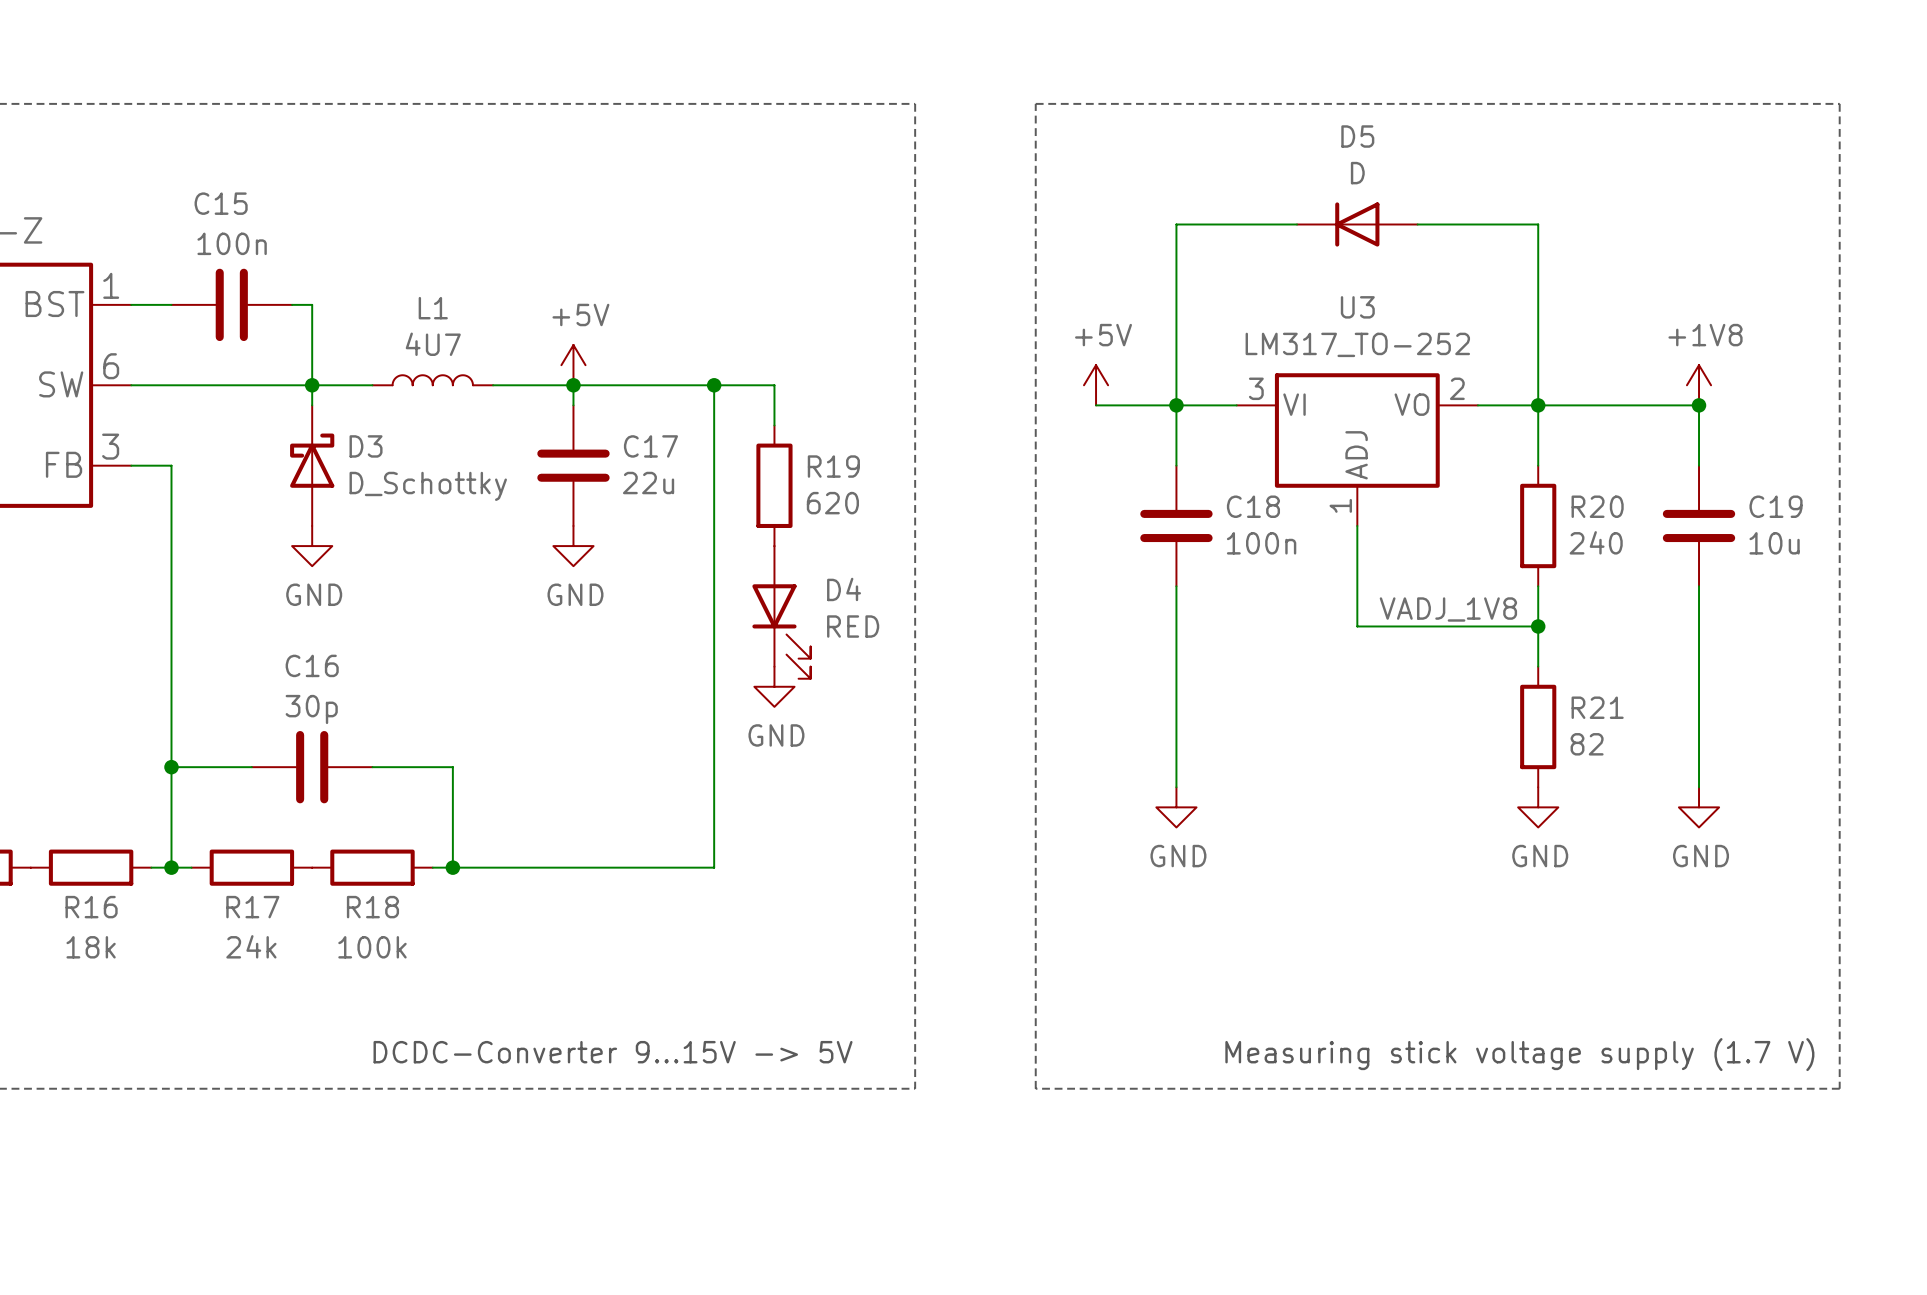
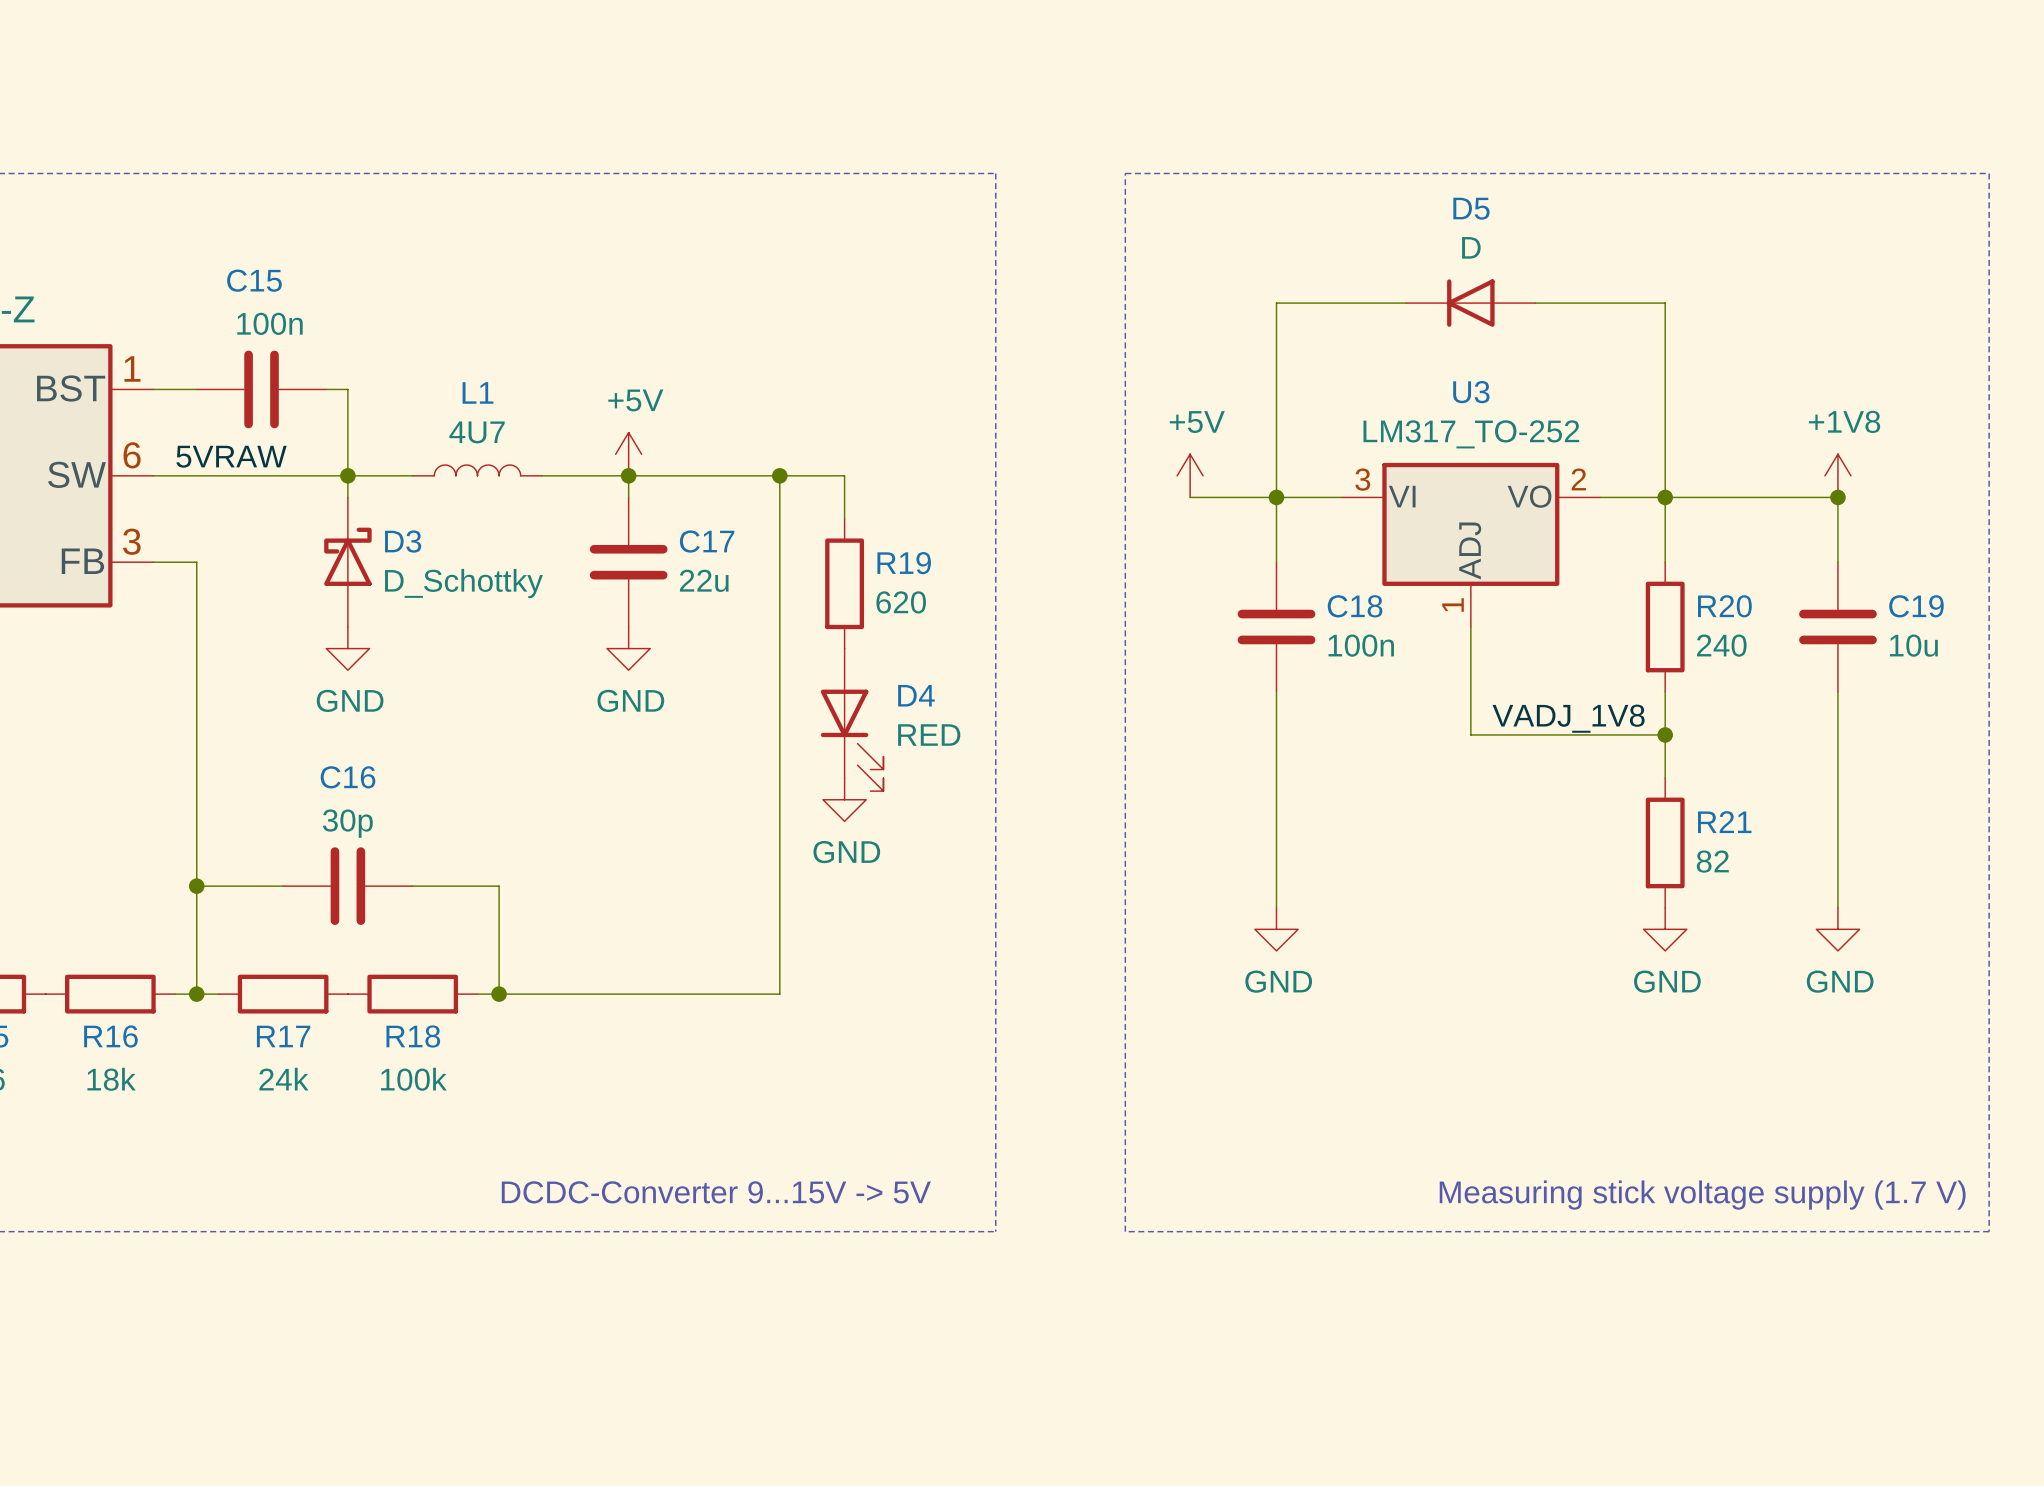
label: none -> 5VRAW (231, 456)

